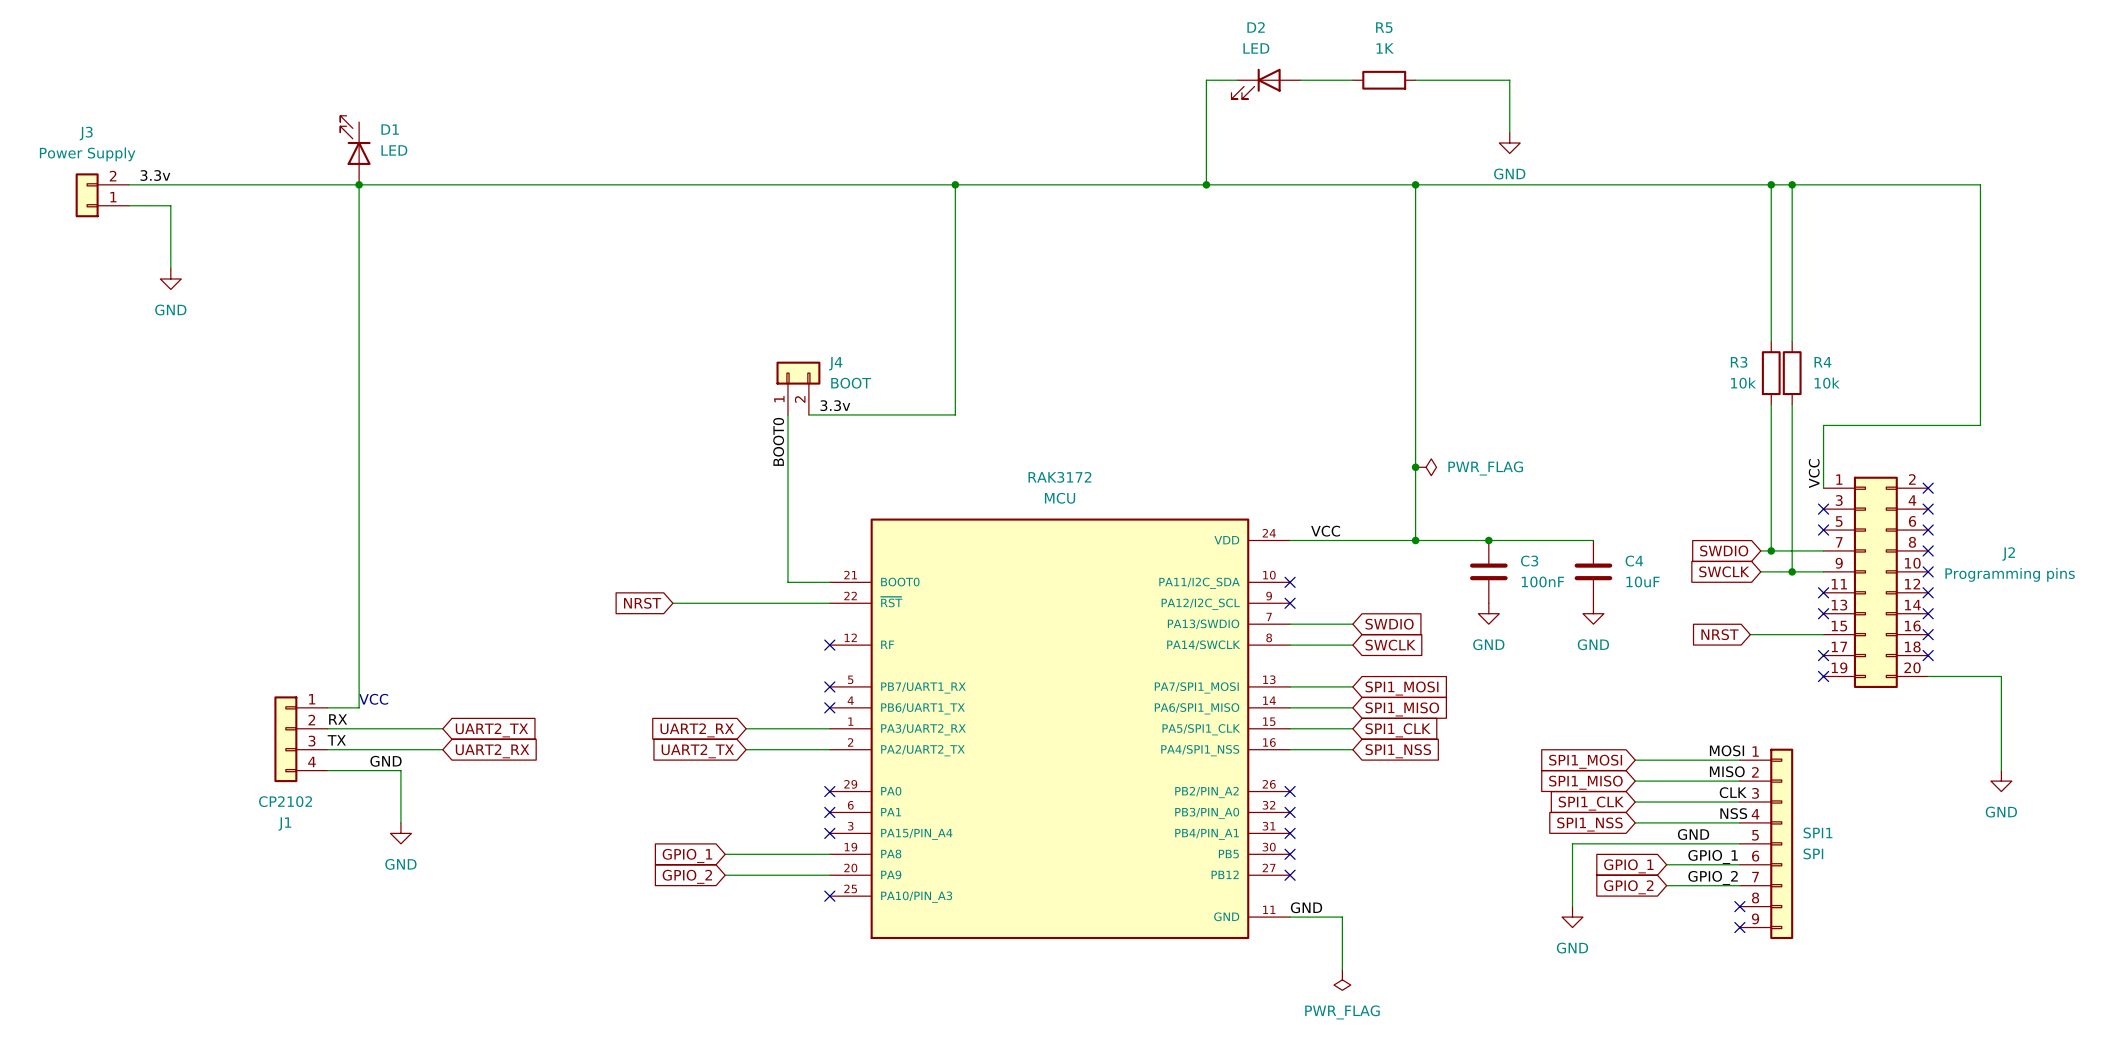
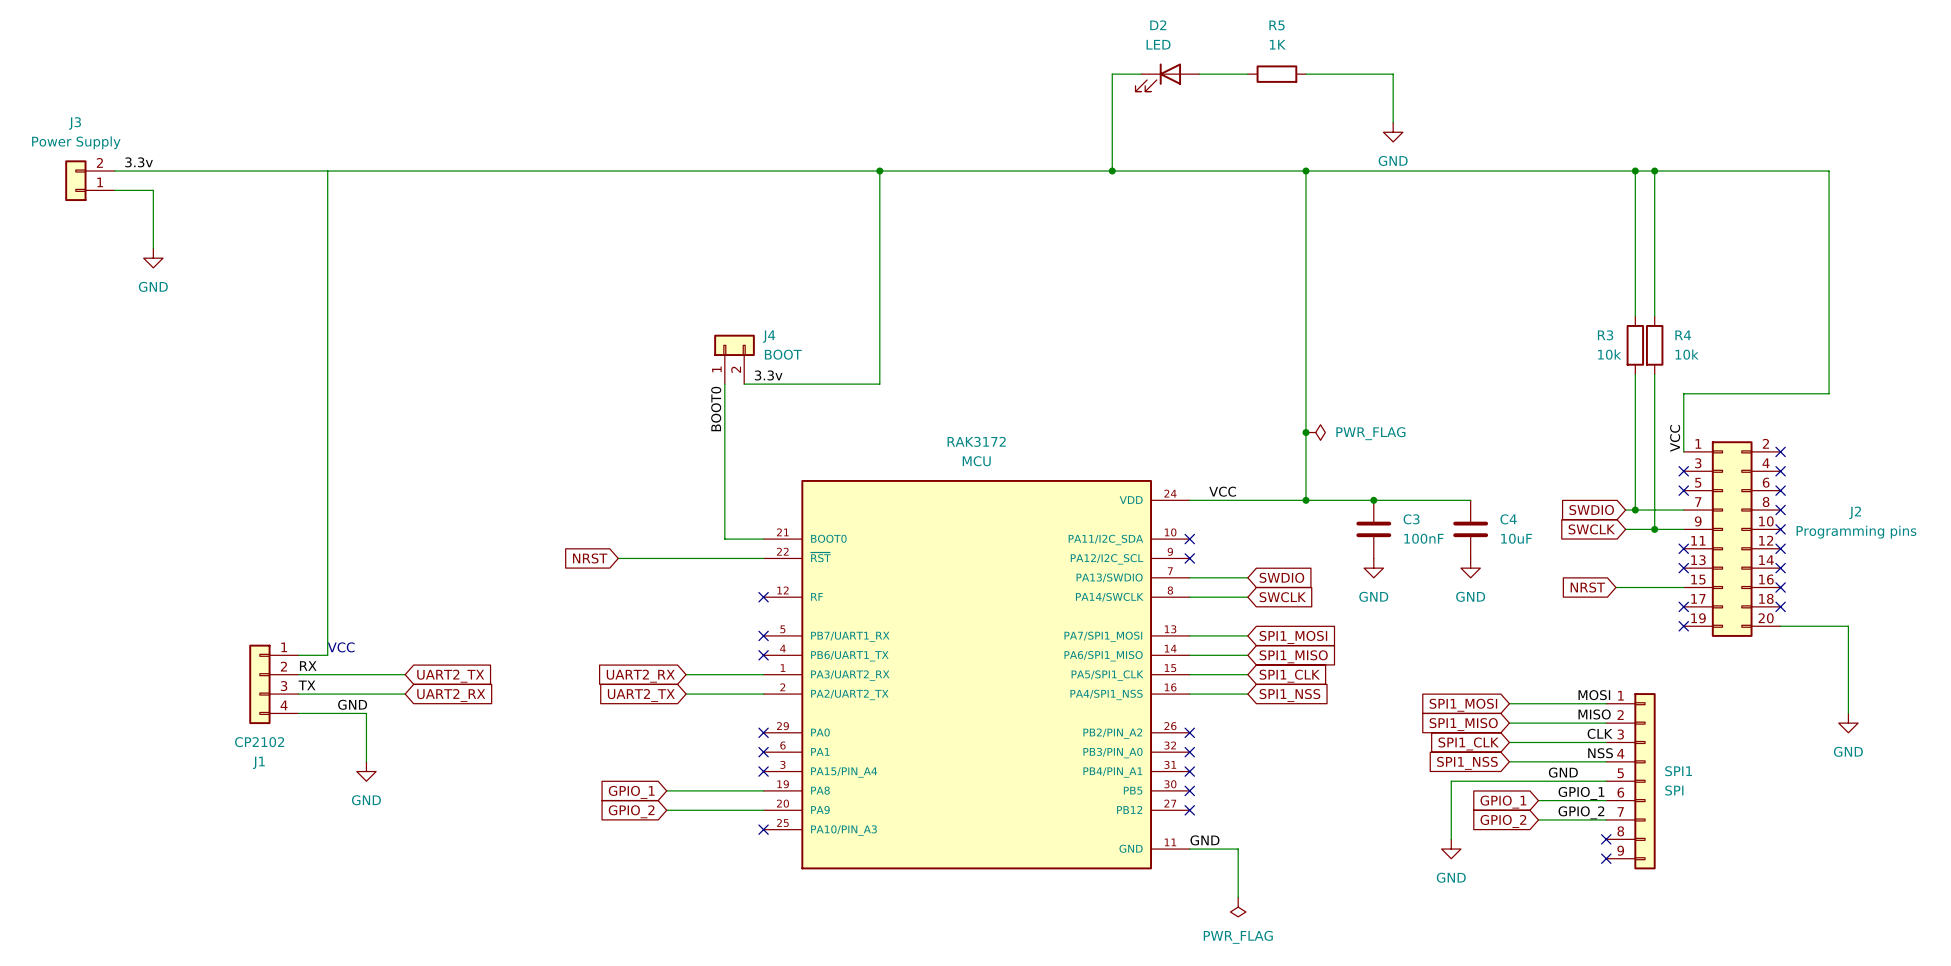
D1: LED (355, 150) -> none
junction: (359, 184) -> none

